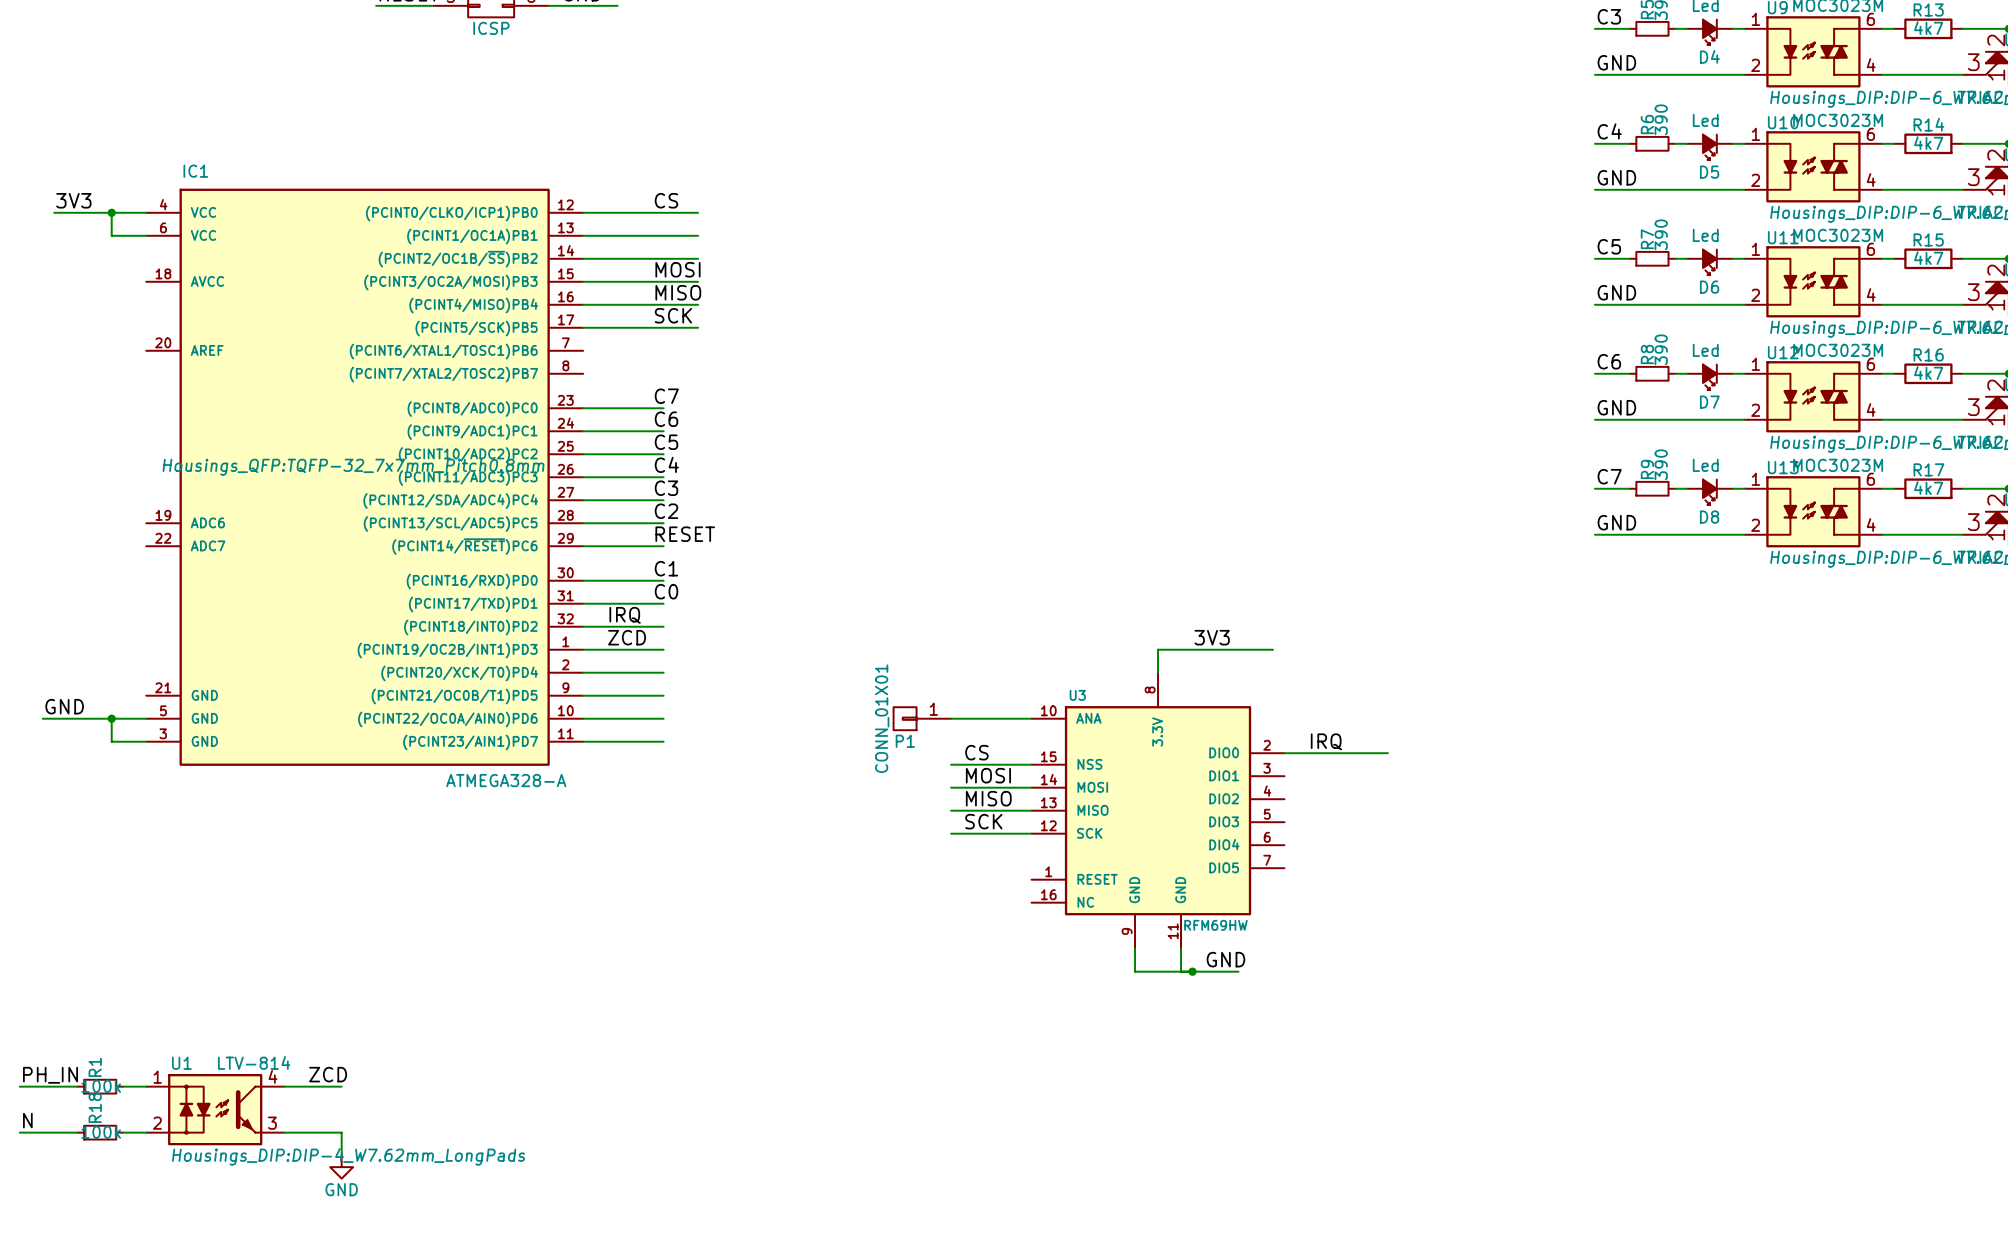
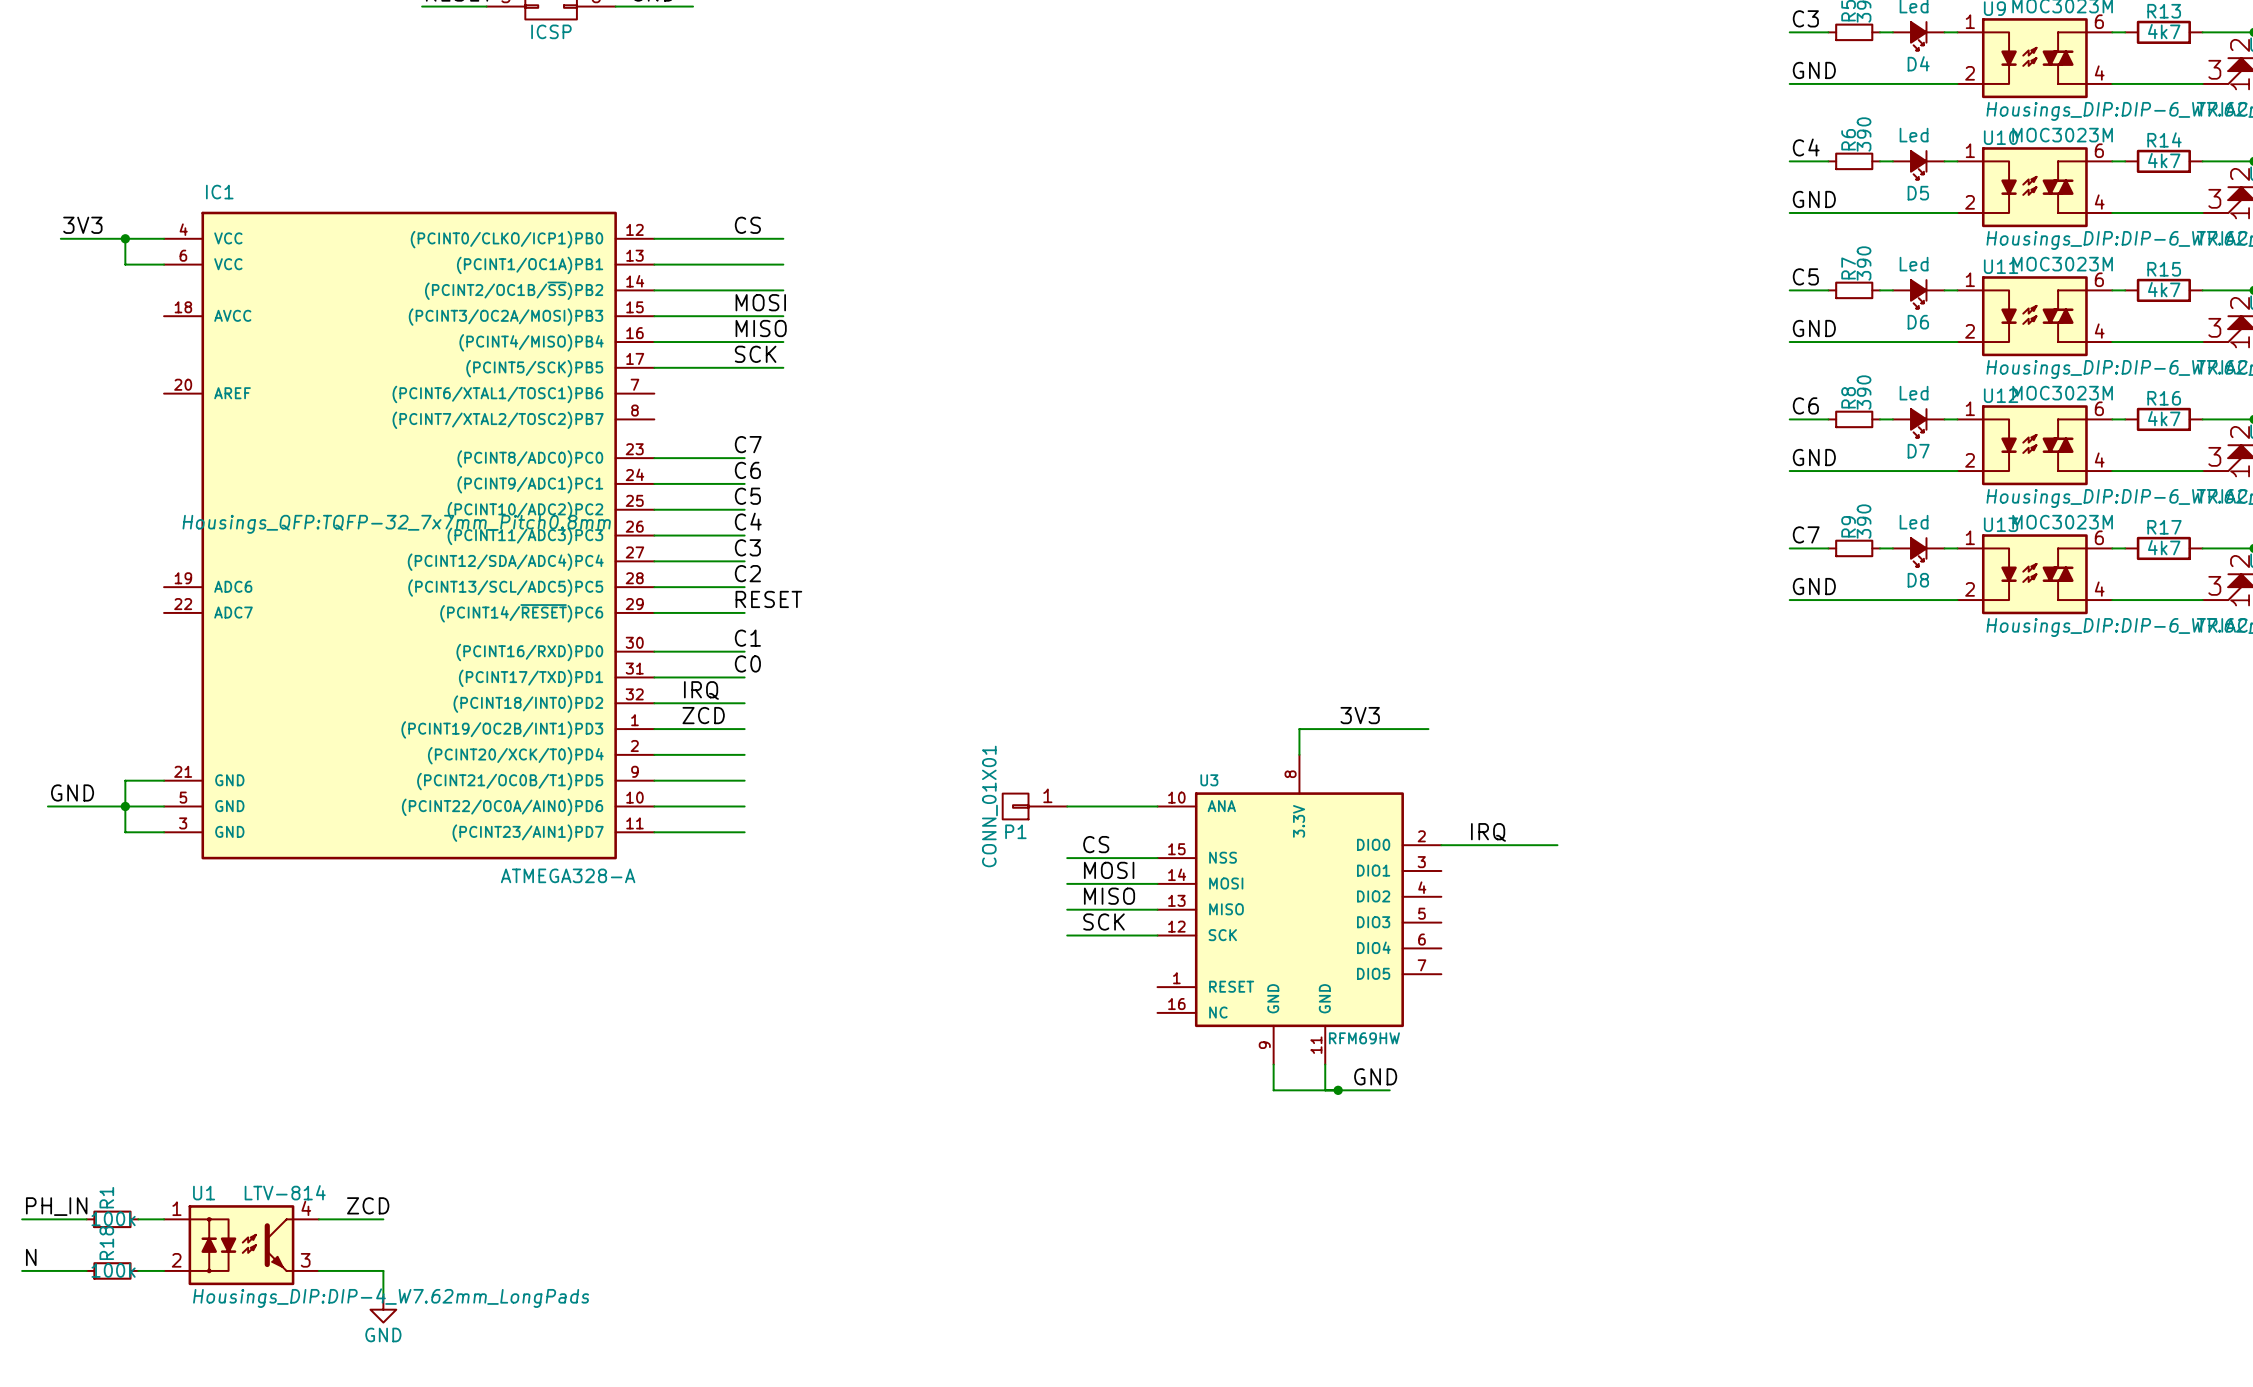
wire: none -> (164, 780) (125, 780) (125, 806)

